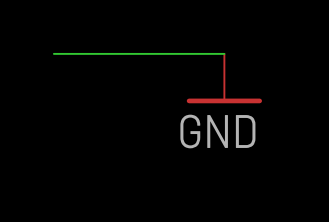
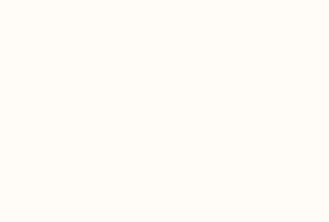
wire: (53, 53) (224, 53) -> none
power symbol: GND (224, 78) -> none

